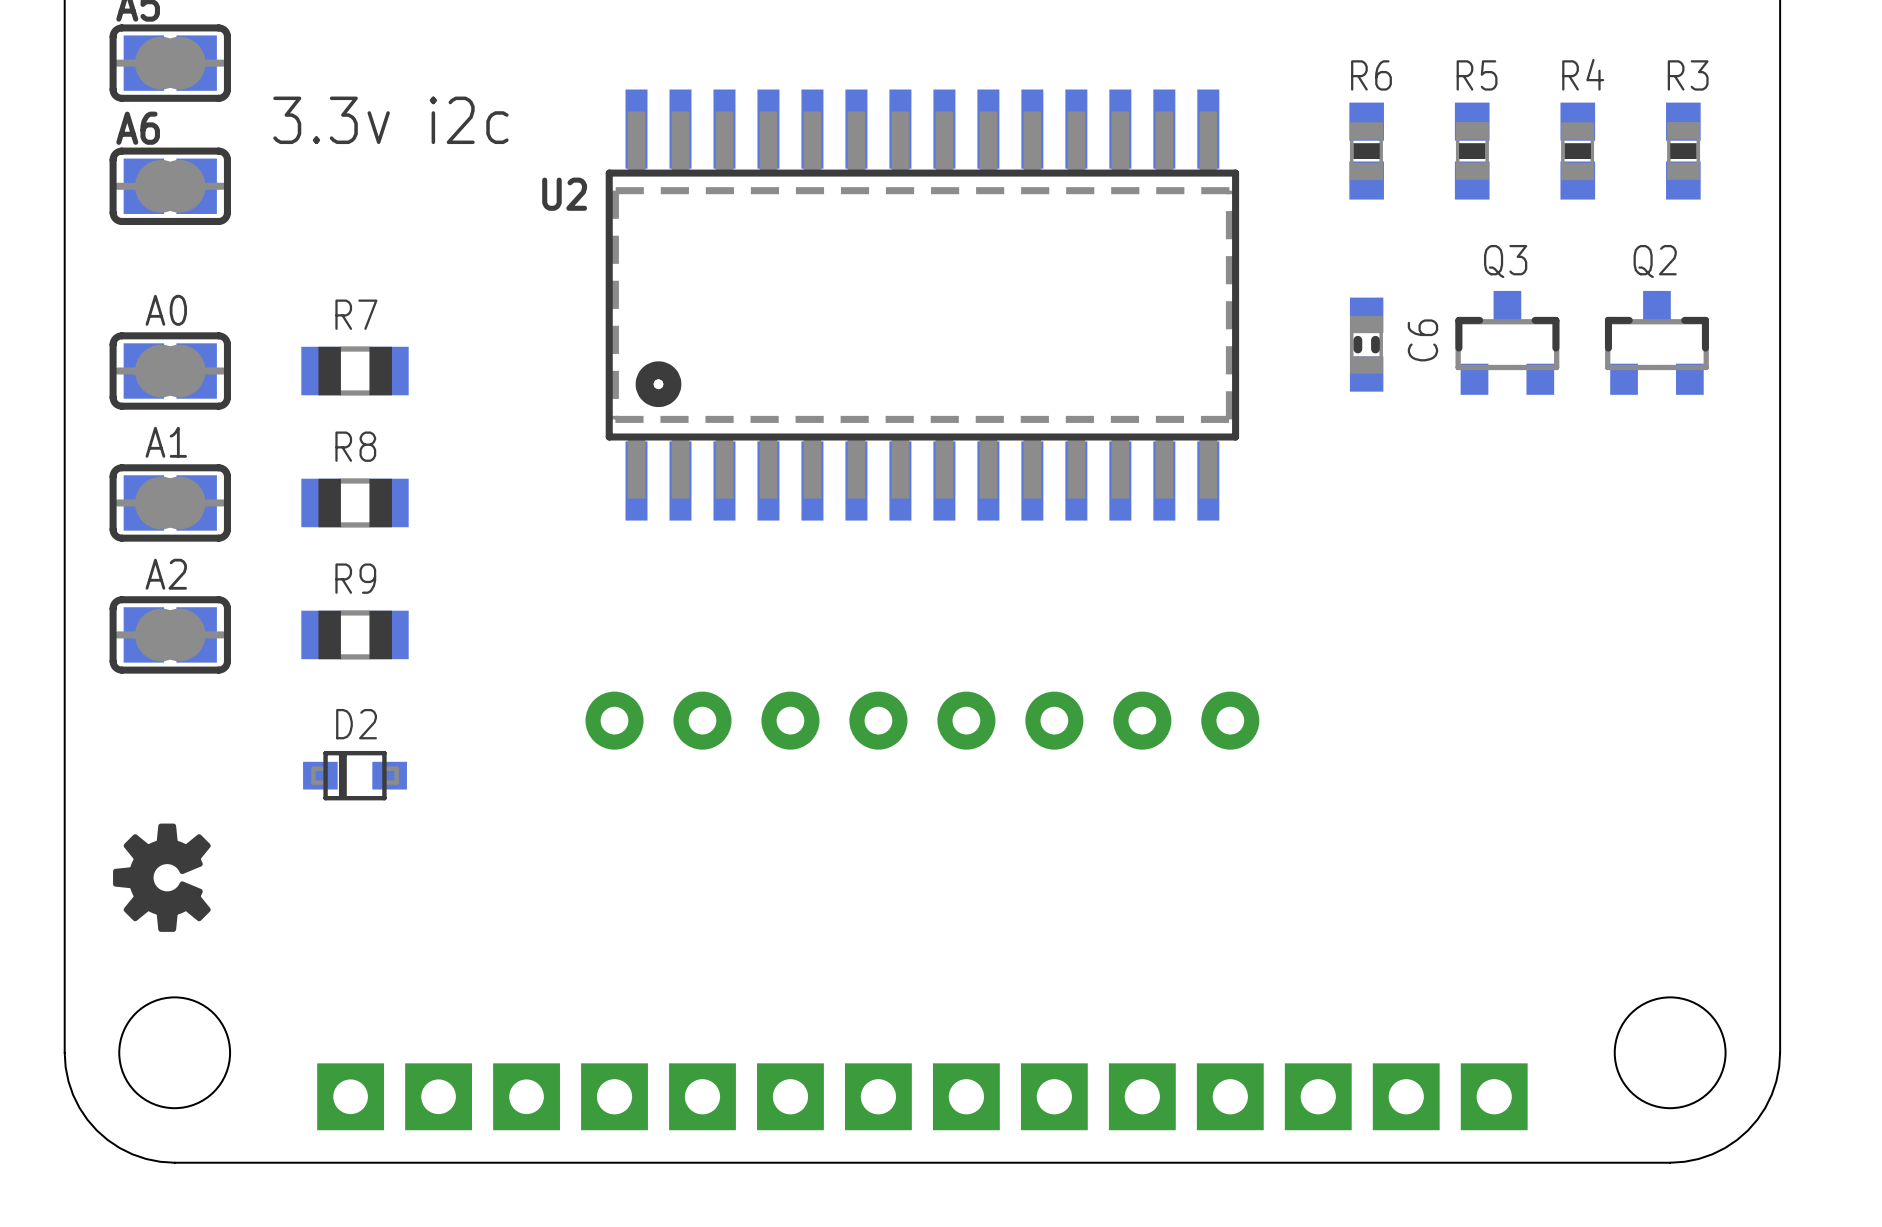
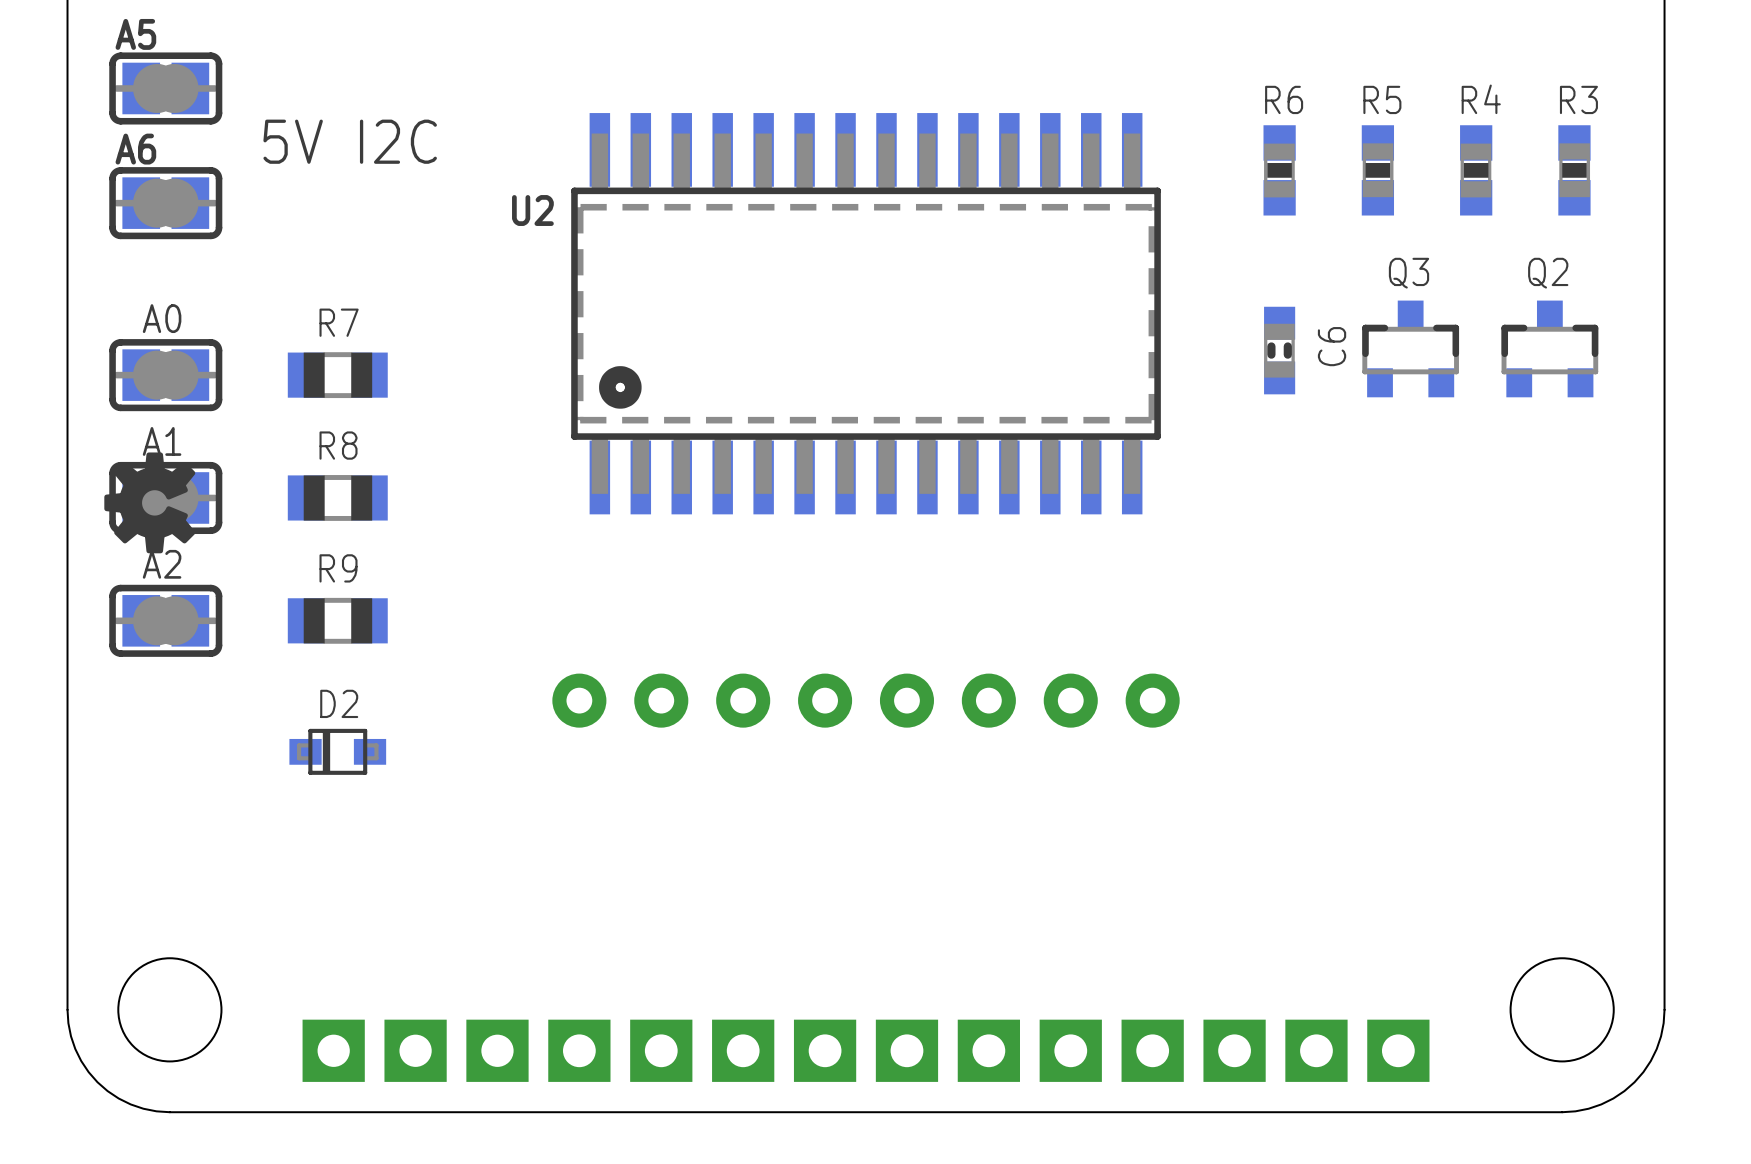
text: 3.3v i2c (390, 120) -> 5V I2C (350, 141)
drawing position: (161, 877) -> (149, 502)

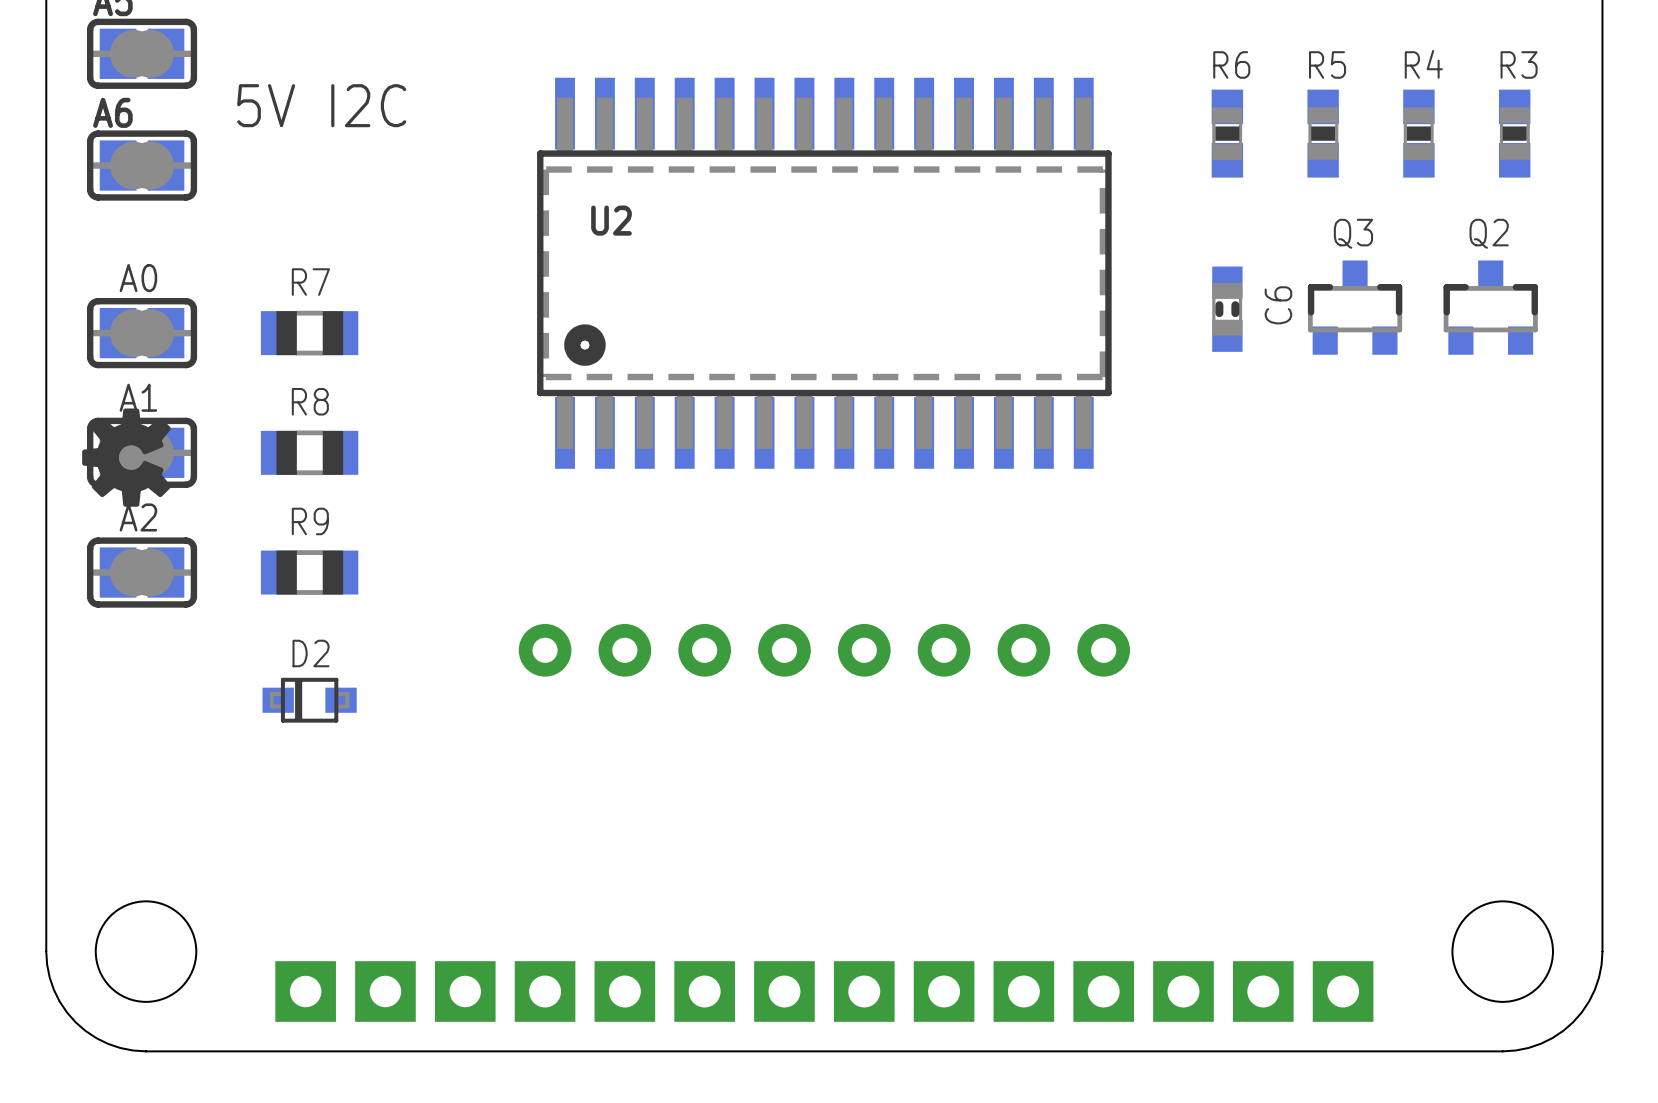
U2 name position: U2 (532, 210) -> U2 (611, 220)

